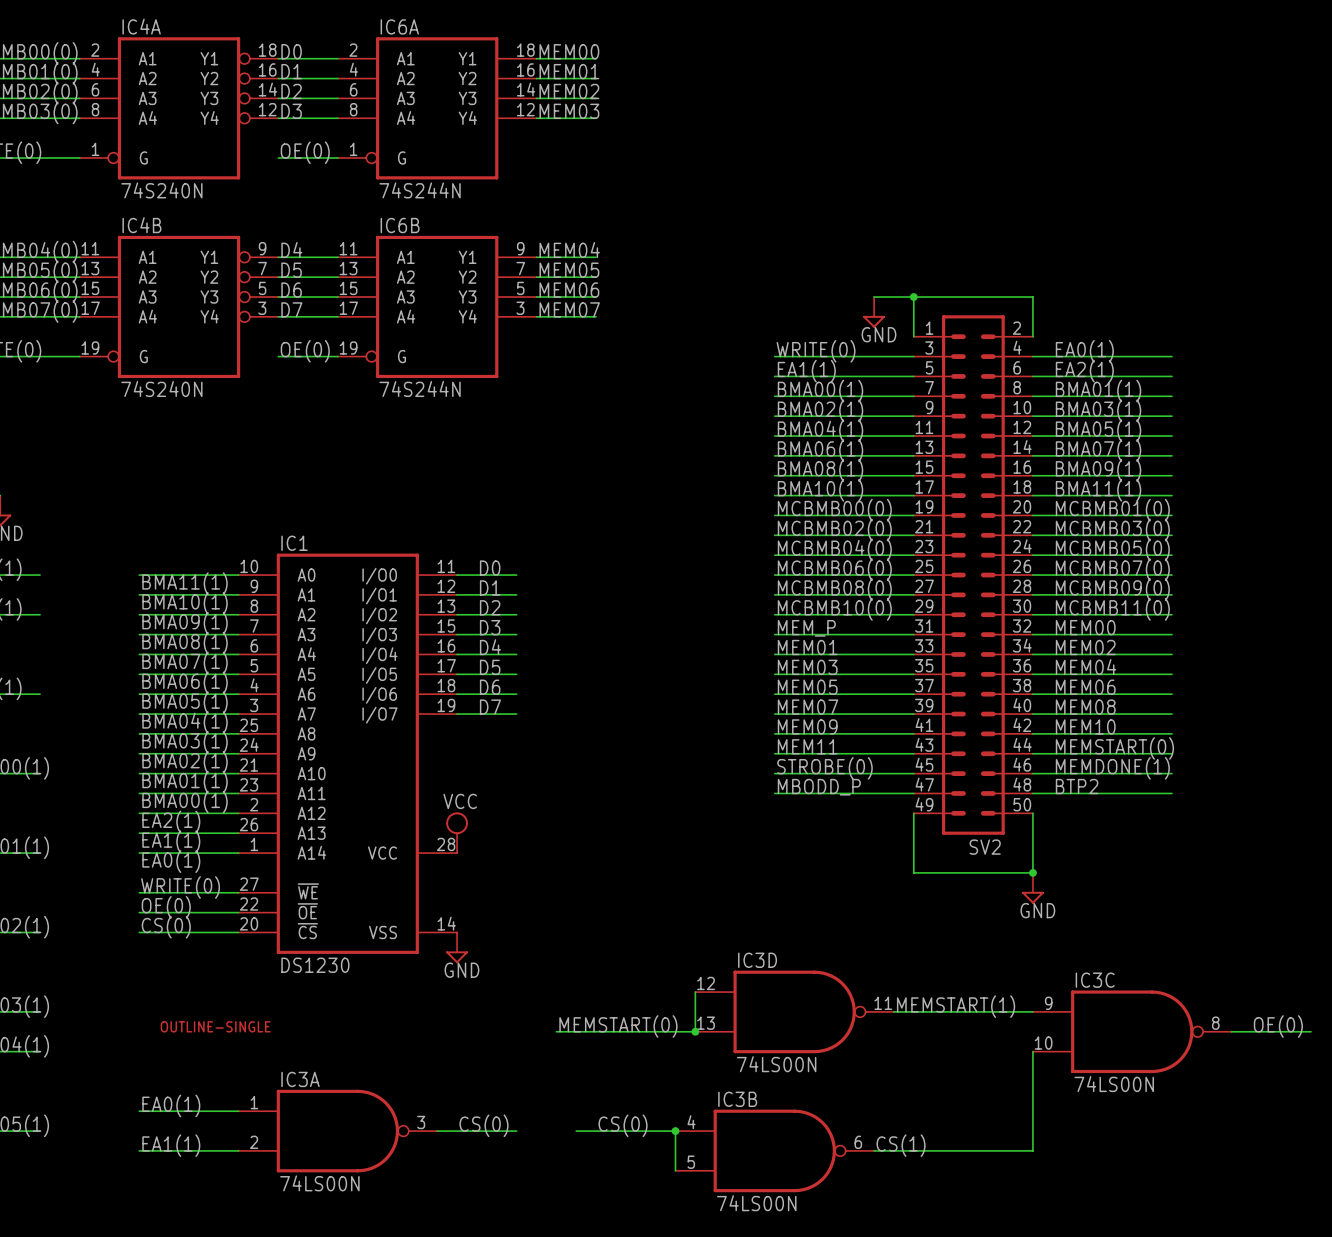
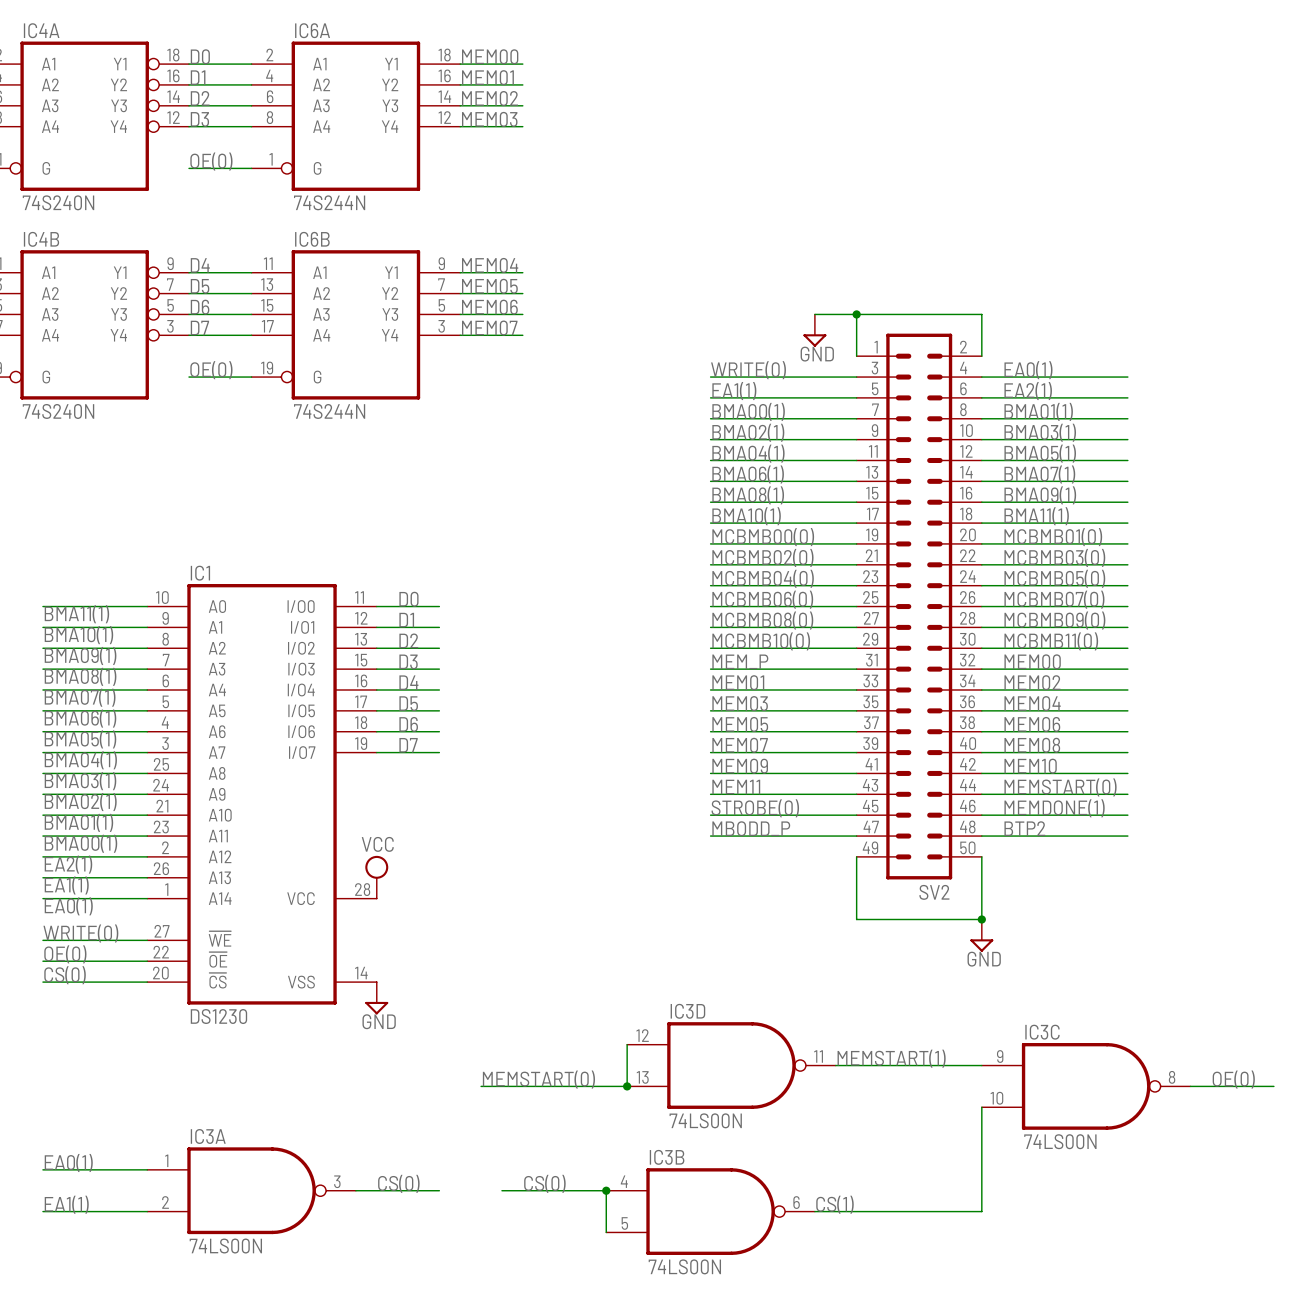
part: OUTLINE-SINGLE (215, 1026) -> none

